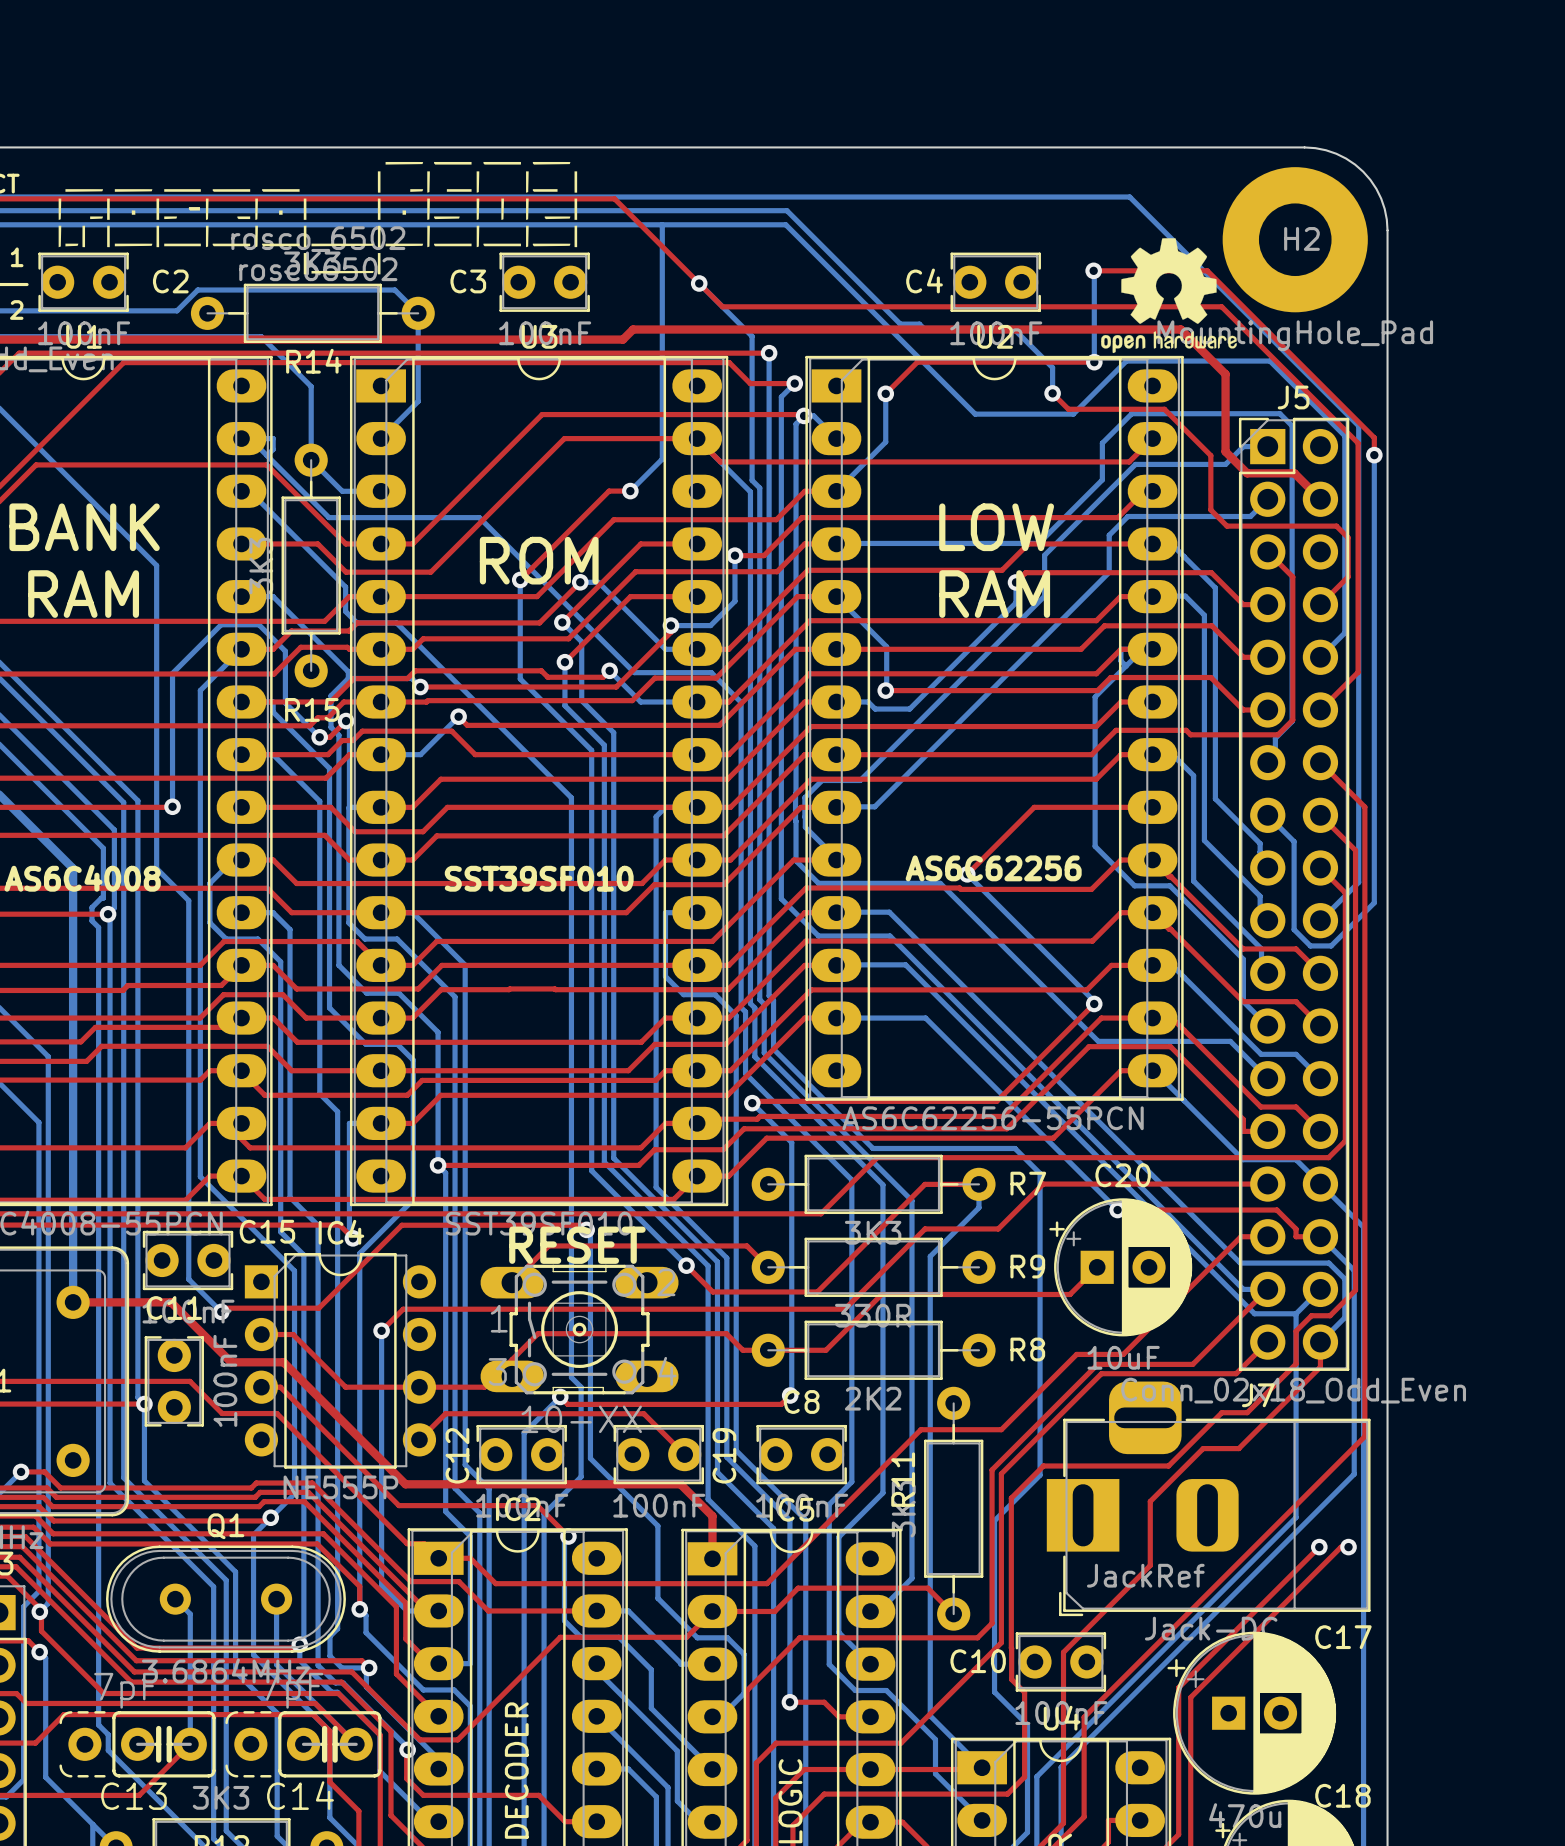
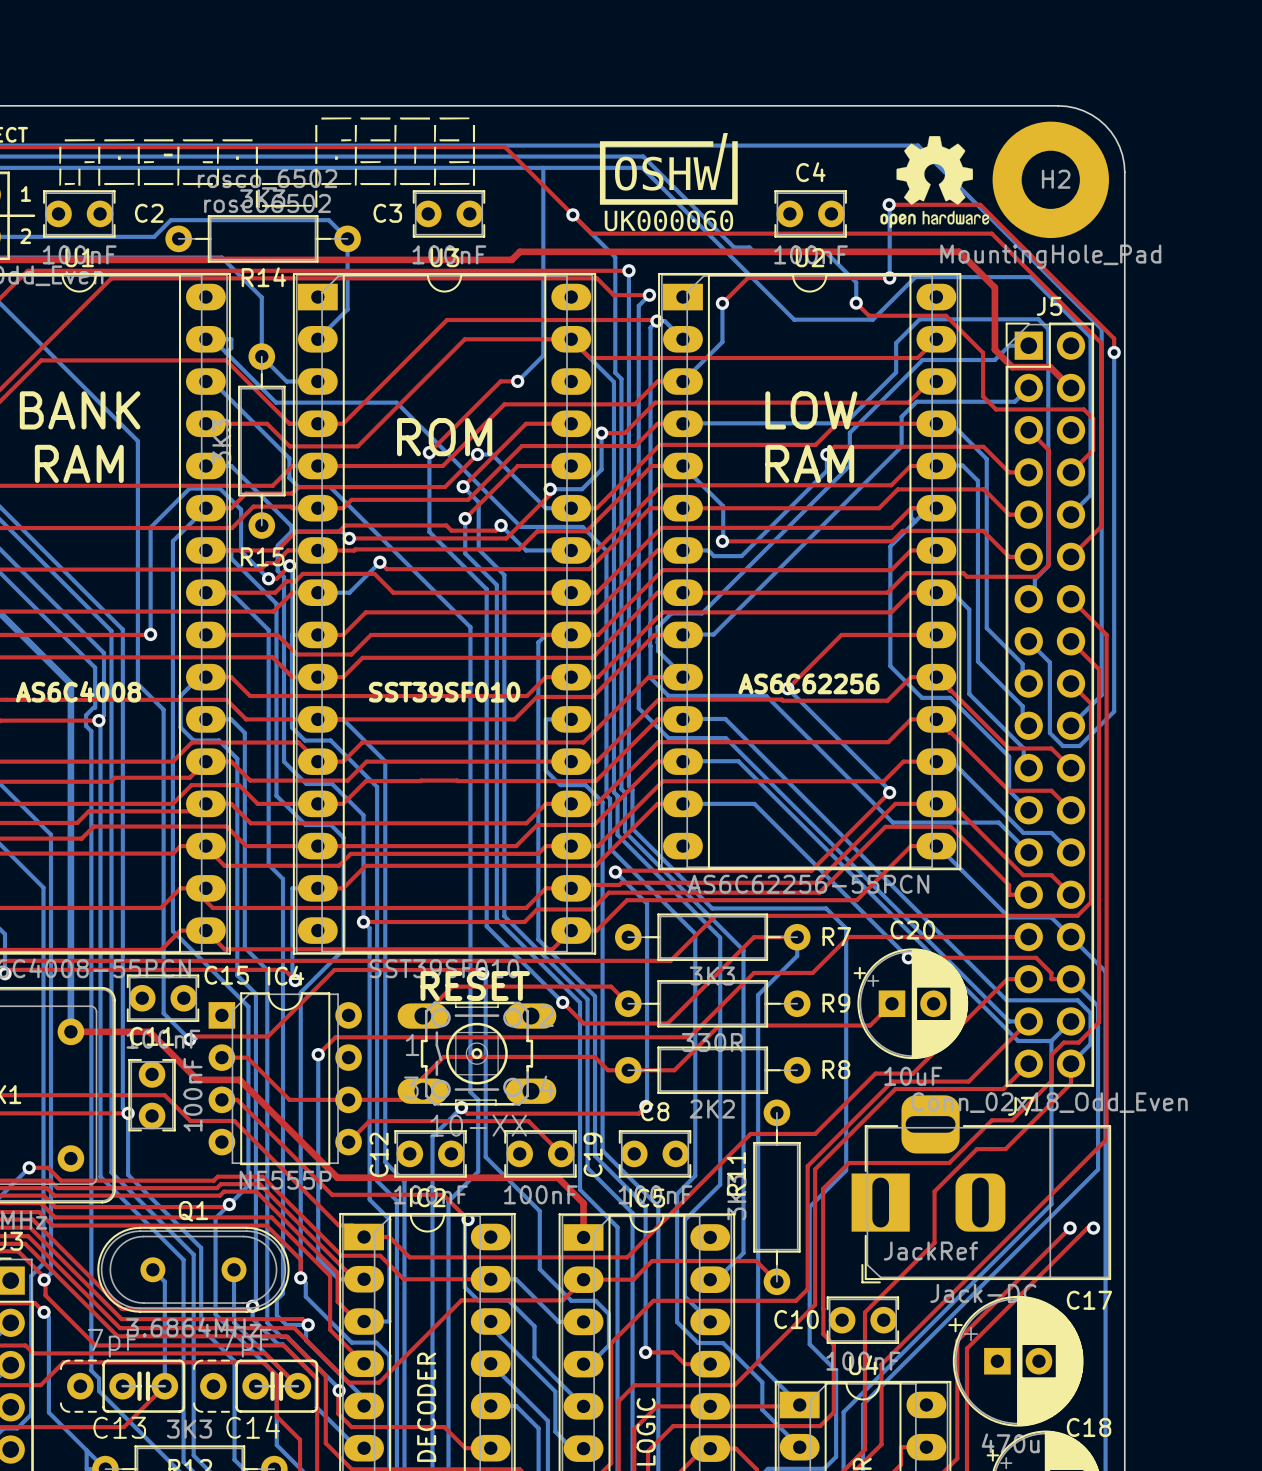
drawing: none -> [599, 133, 738, 232]
C4 name position: C4 (924, 280) -> C4 (810, 172)
drawing position: (1168, 295) -> (934, 182)

